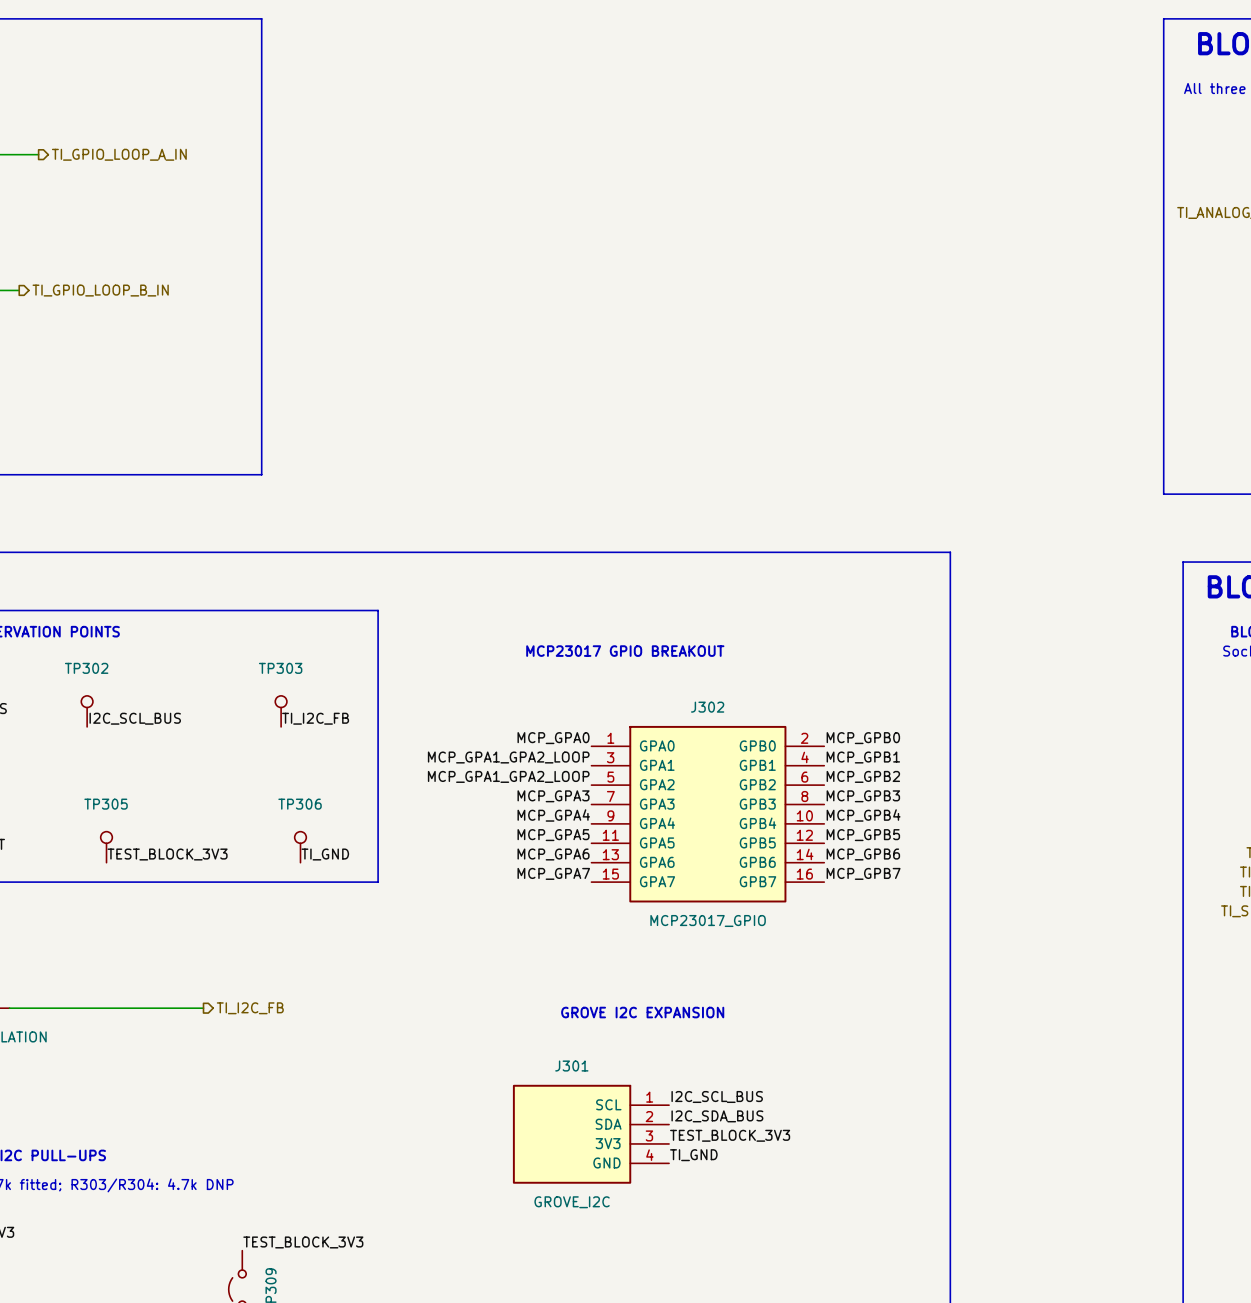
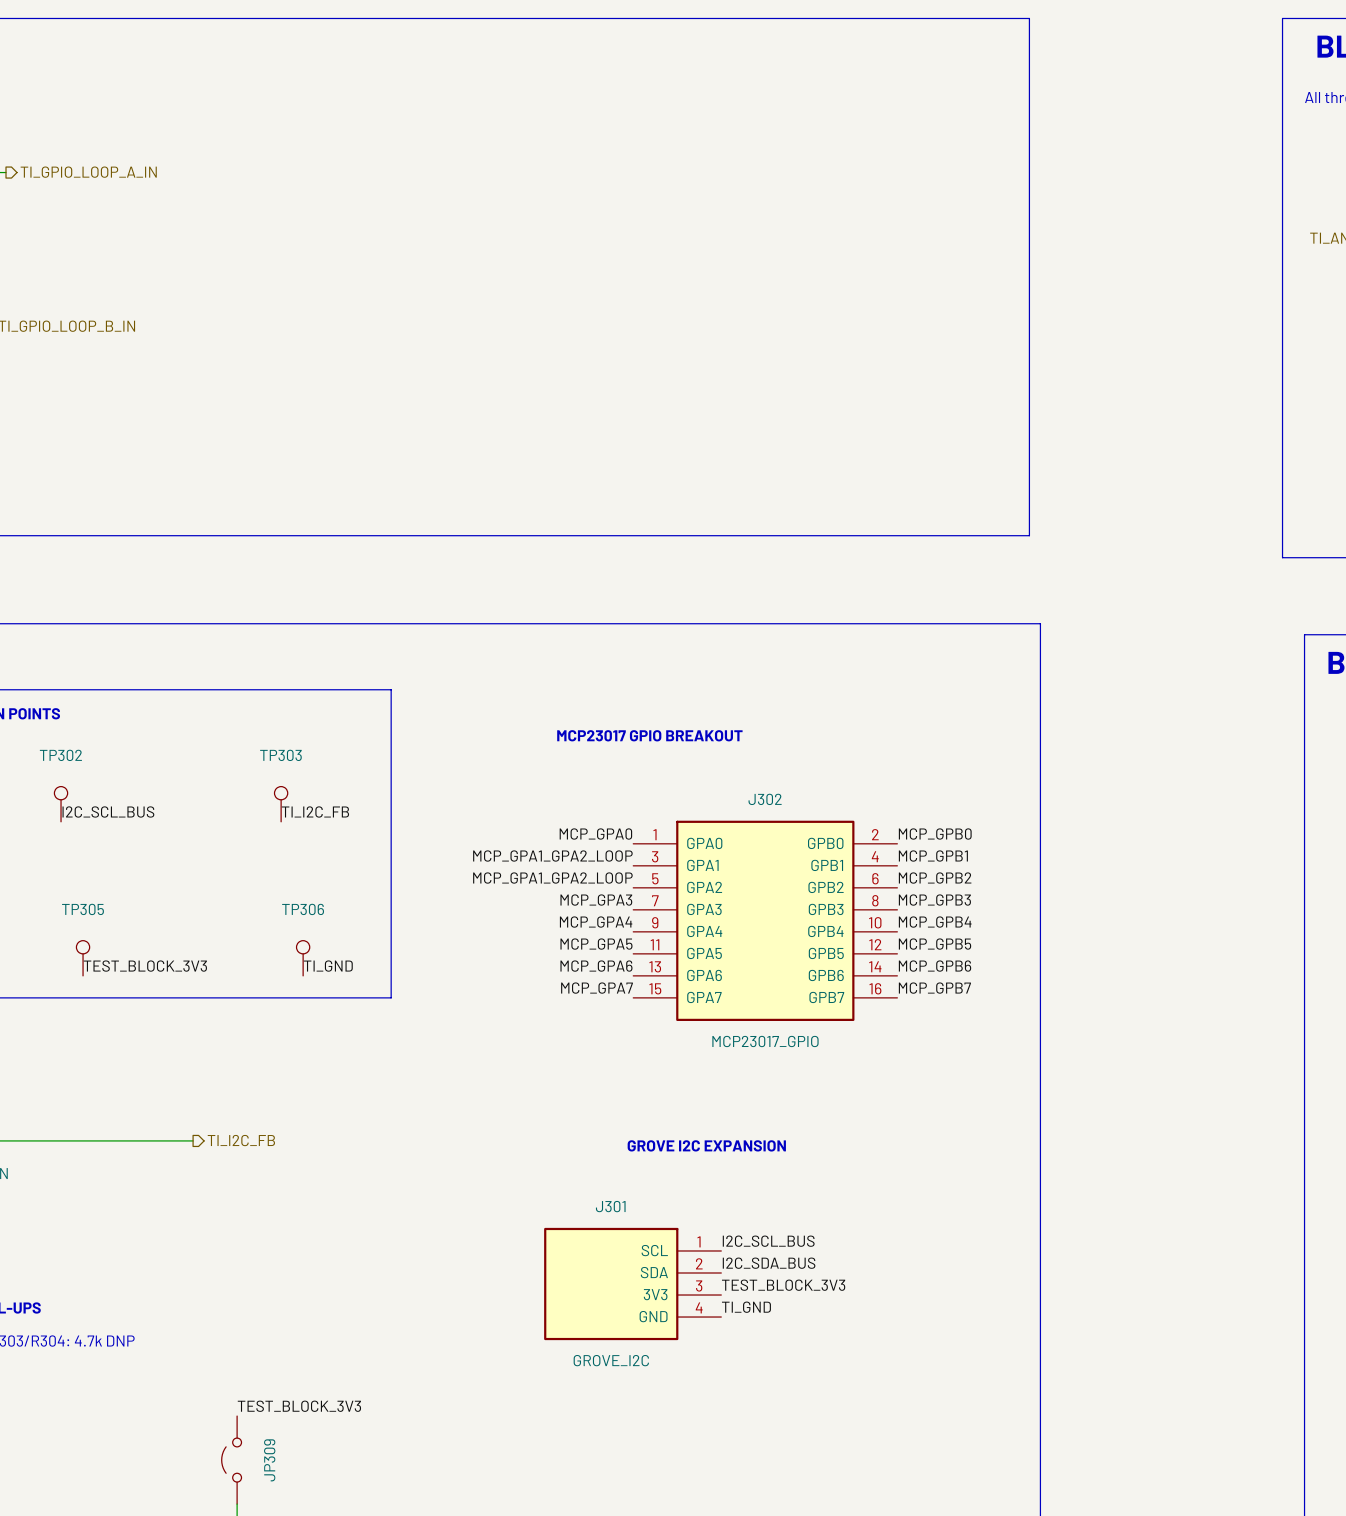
line: (261, 18) (261, 474) -> (259, 18) (1029, 18) (1029, 535) (259, 535)

